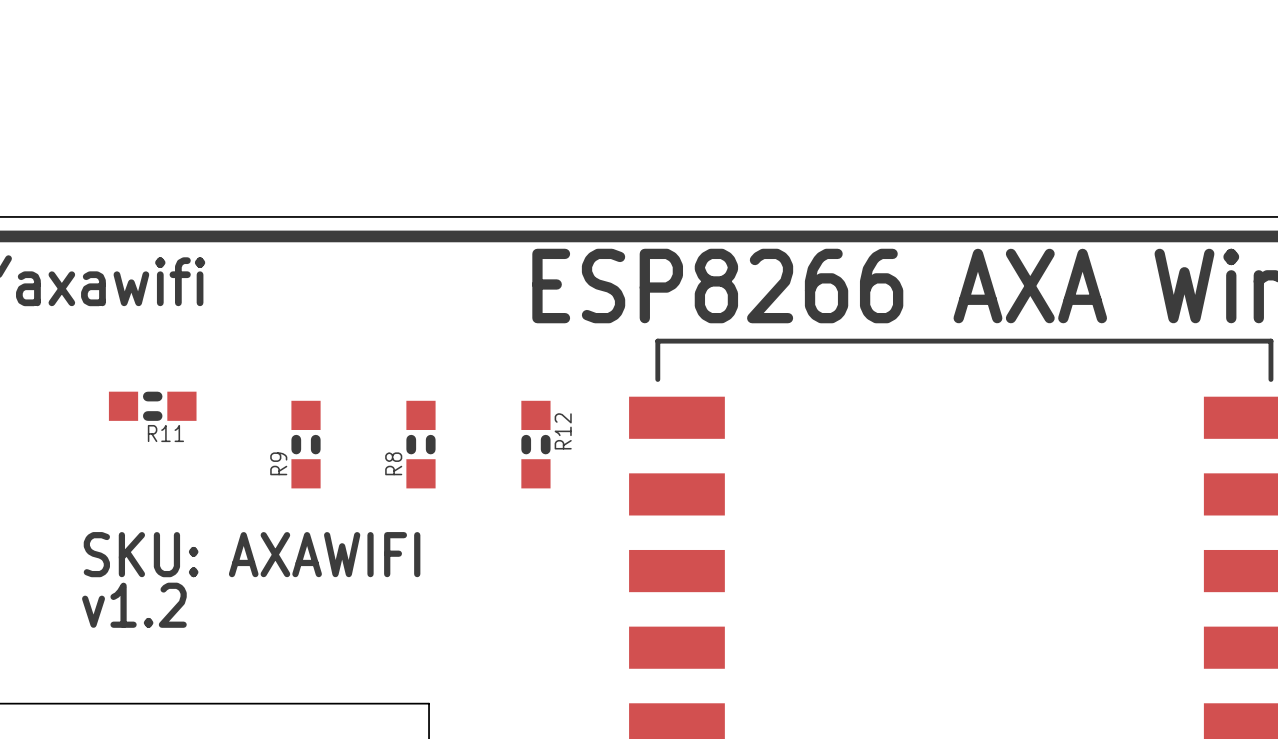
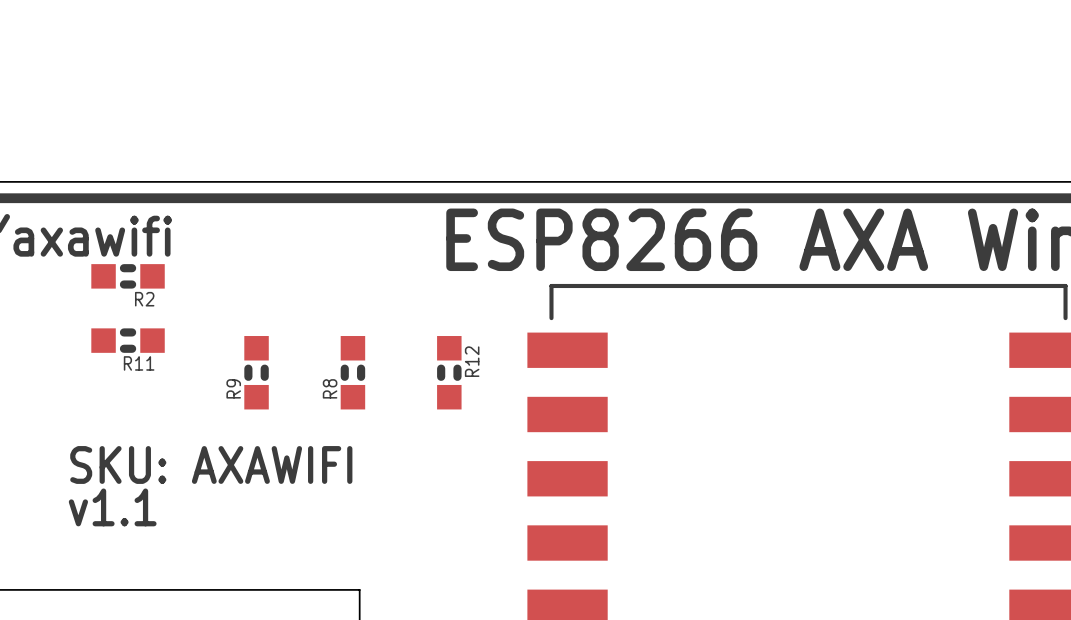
R2: none -> (128, 276)
text: v1.2 (134, 605) -> v1.1 (112, 507)

